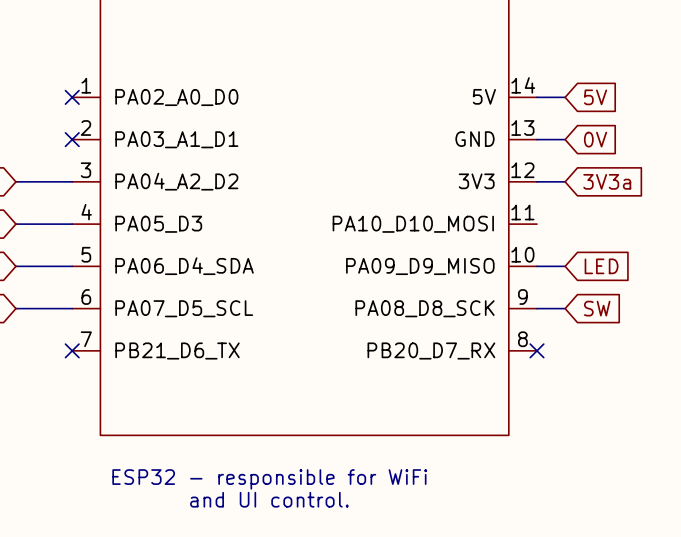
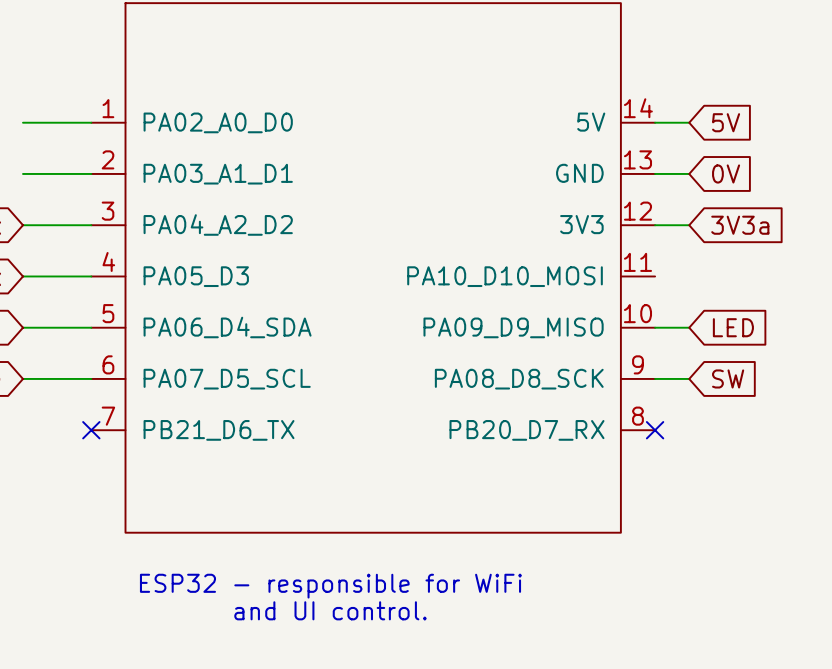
wire: none -> (23, 122) (91, 122)
no-connect mark: (72, 97) -> none
wire: none -> (23, 173) (91, 173)
no-connect mark: (72, 139) -> none

